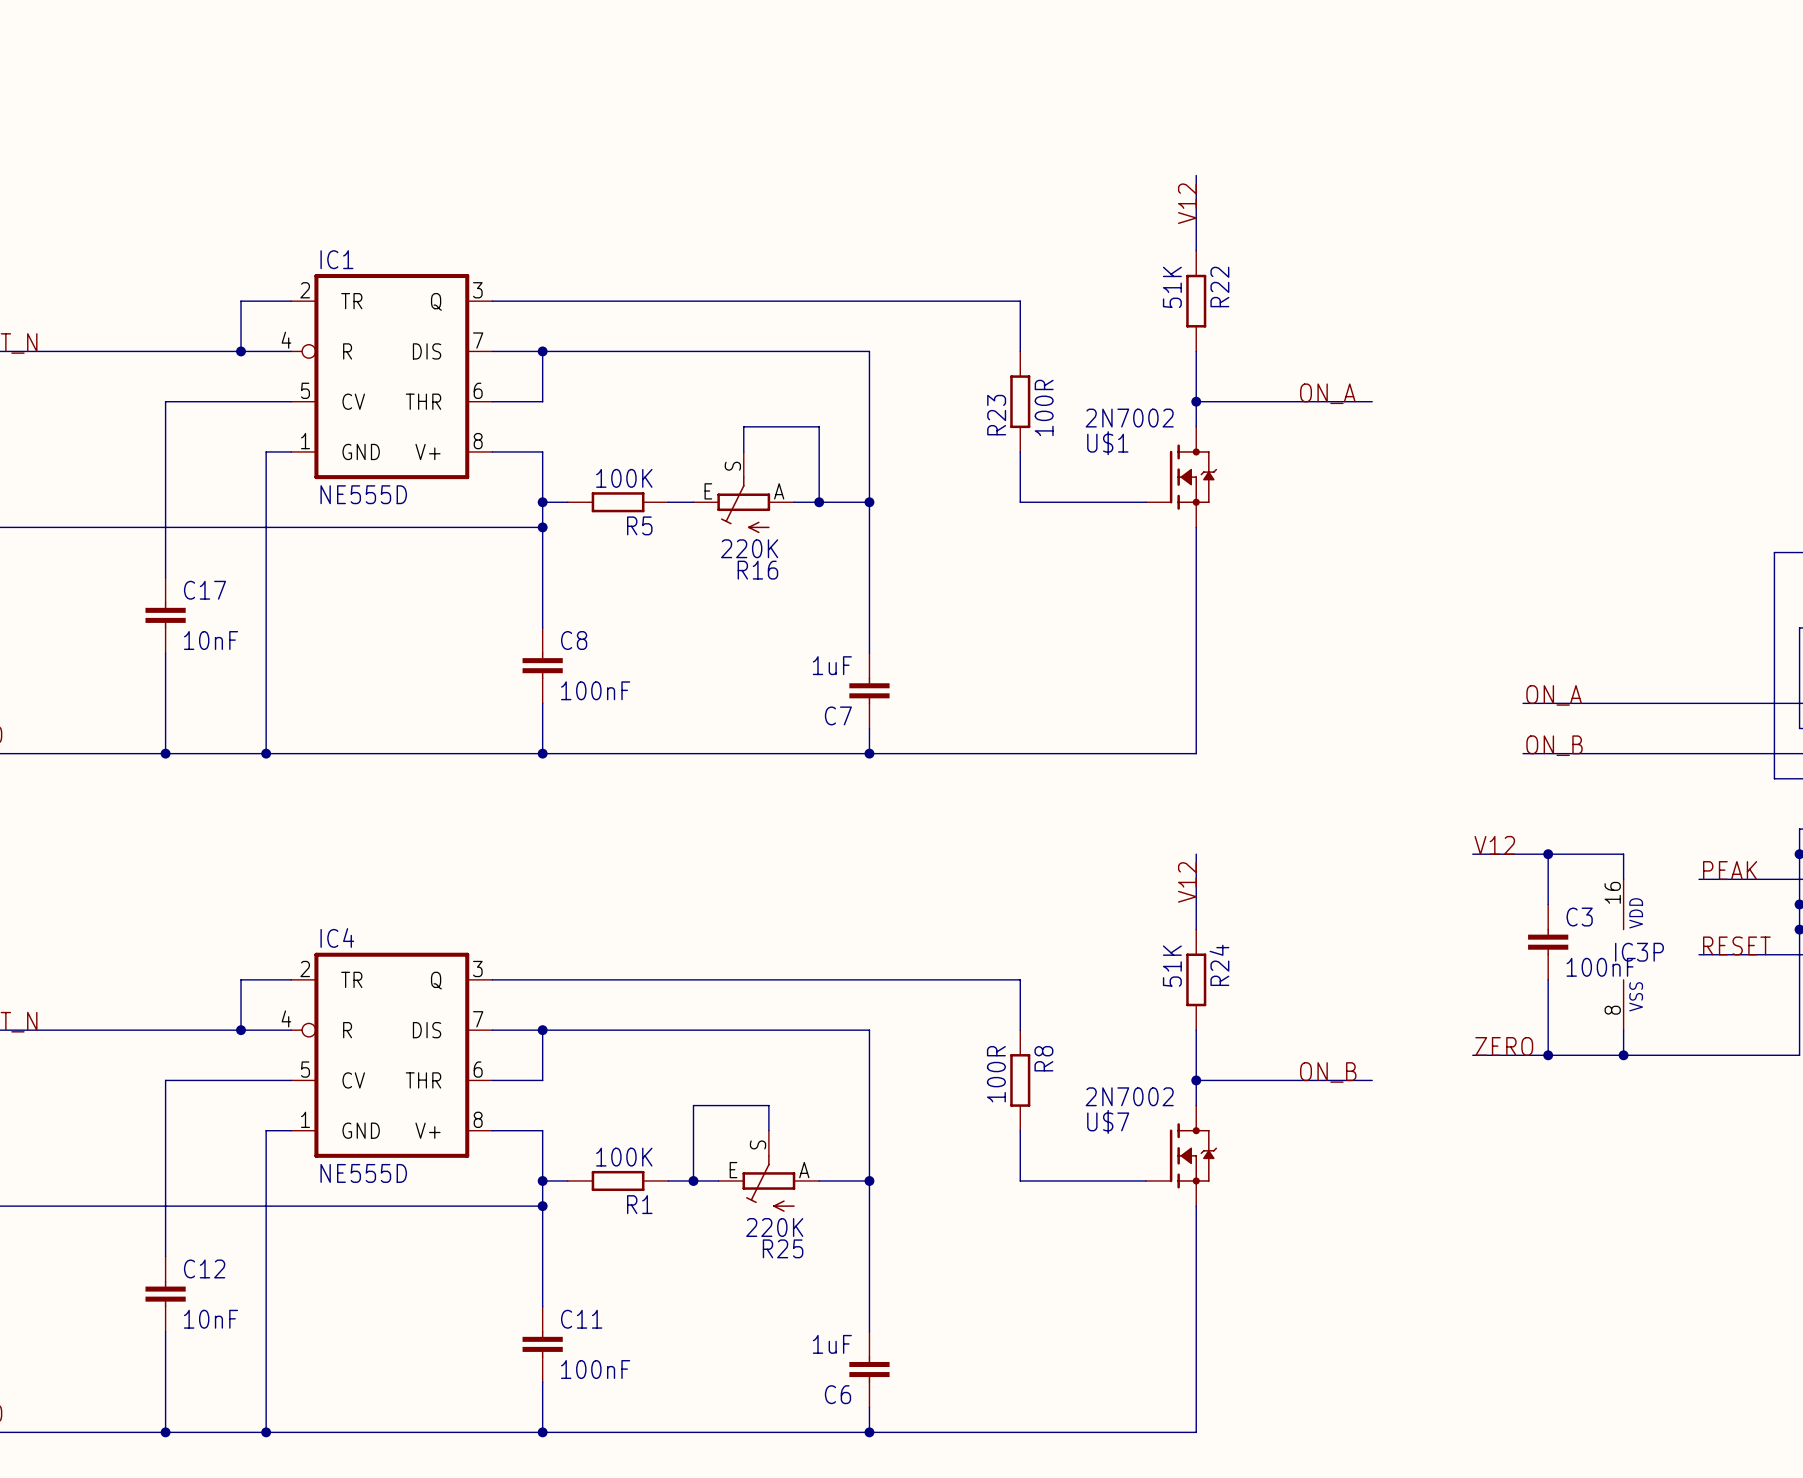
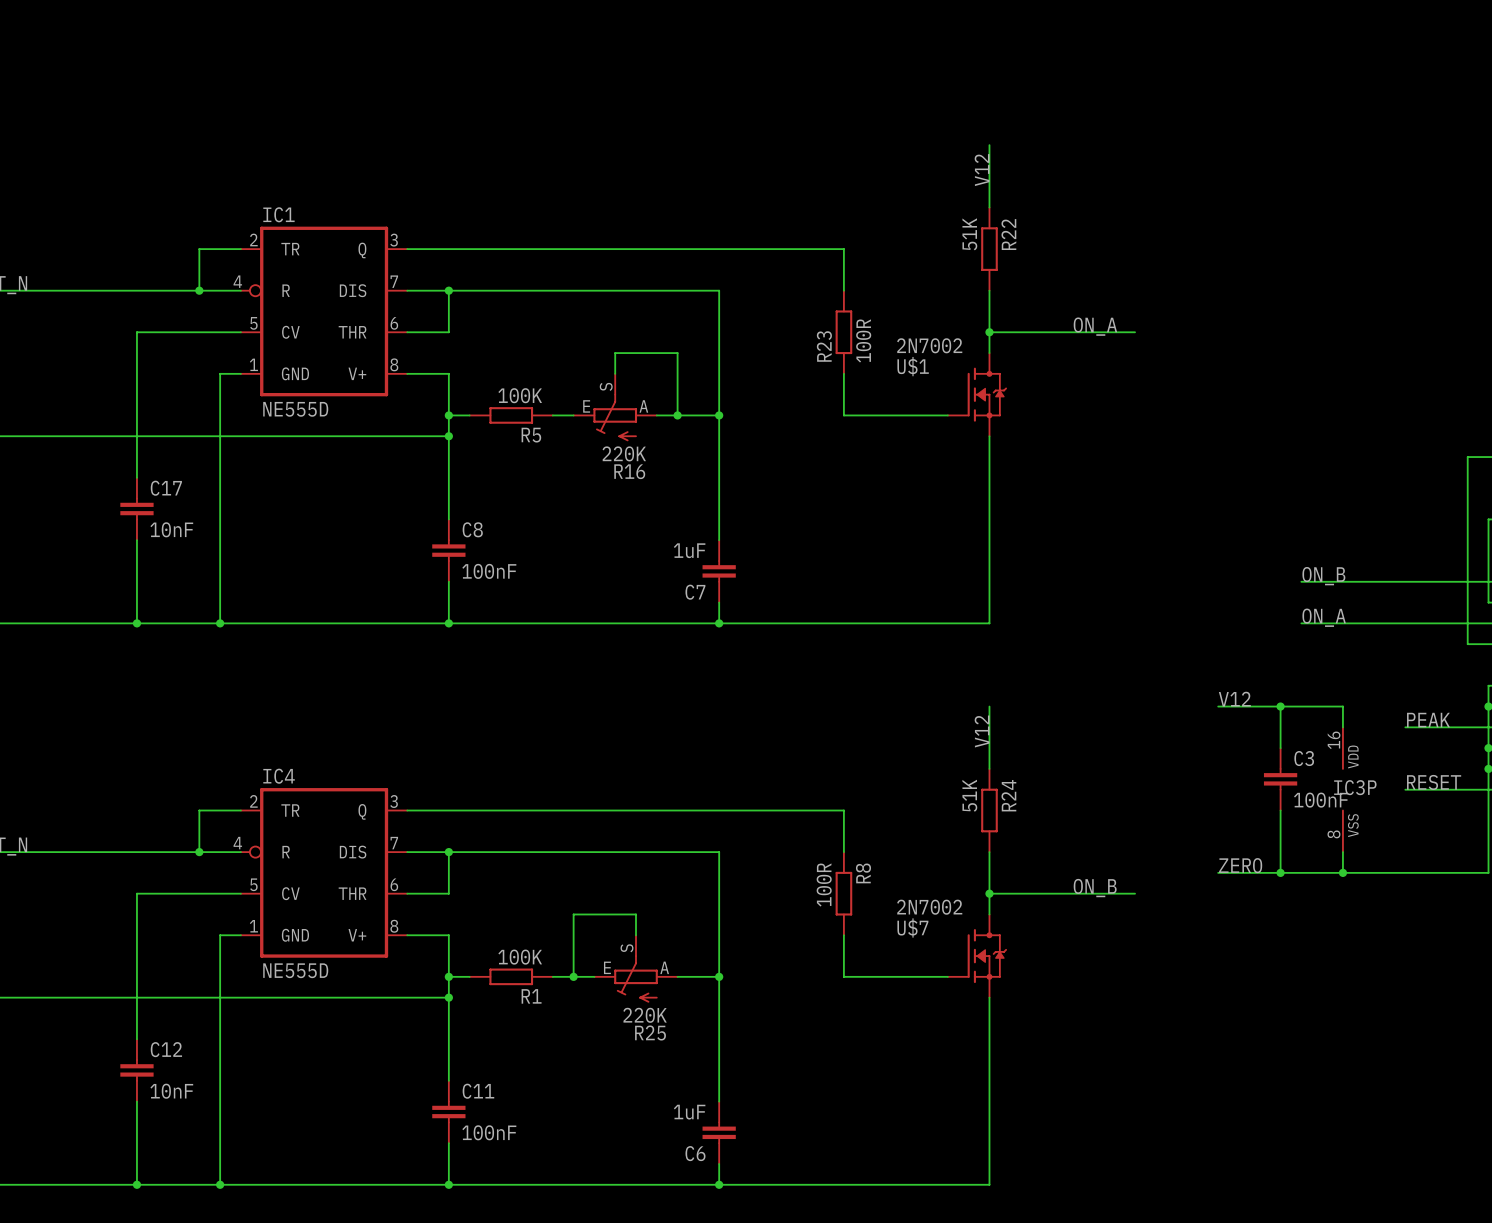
label position: ON_A (1554, 695) -> ON_A (1324, 617)
wire: (1523, 703) (1573, 703) -> none
label position: ON_B (1554, 745) -> ON_B (1323, 576)
wire: (1523, 753) (1573, 753) -> none

